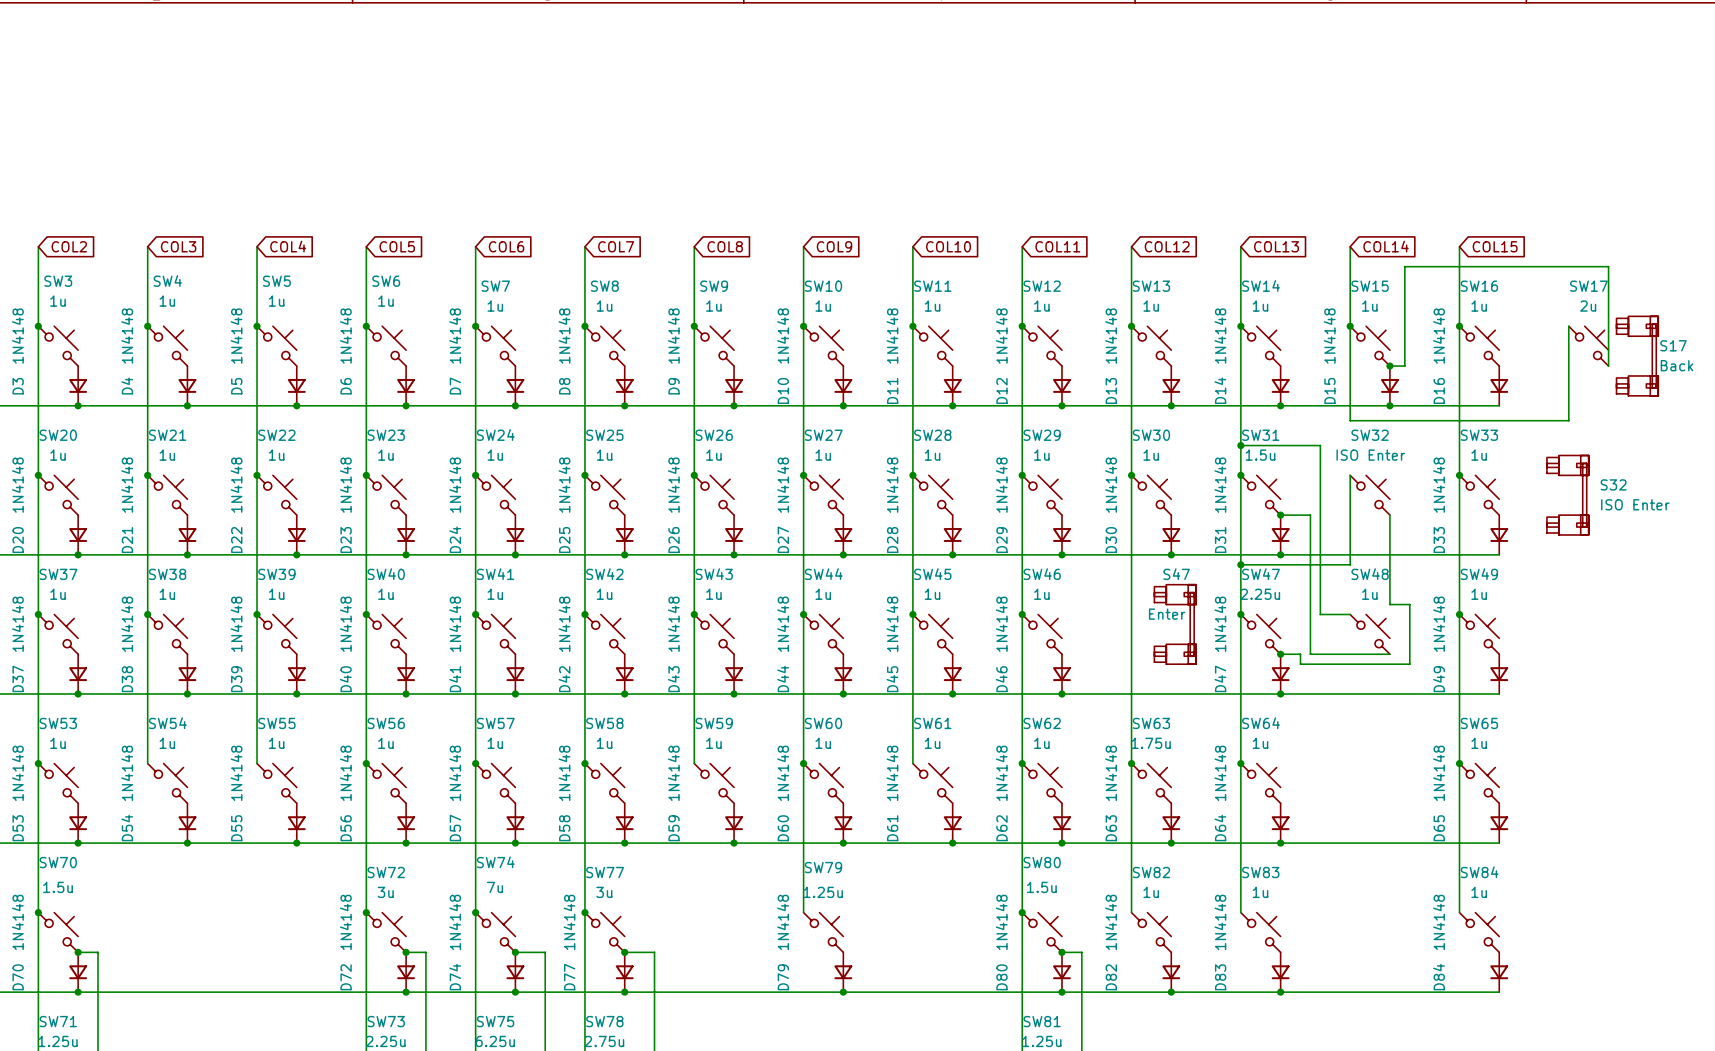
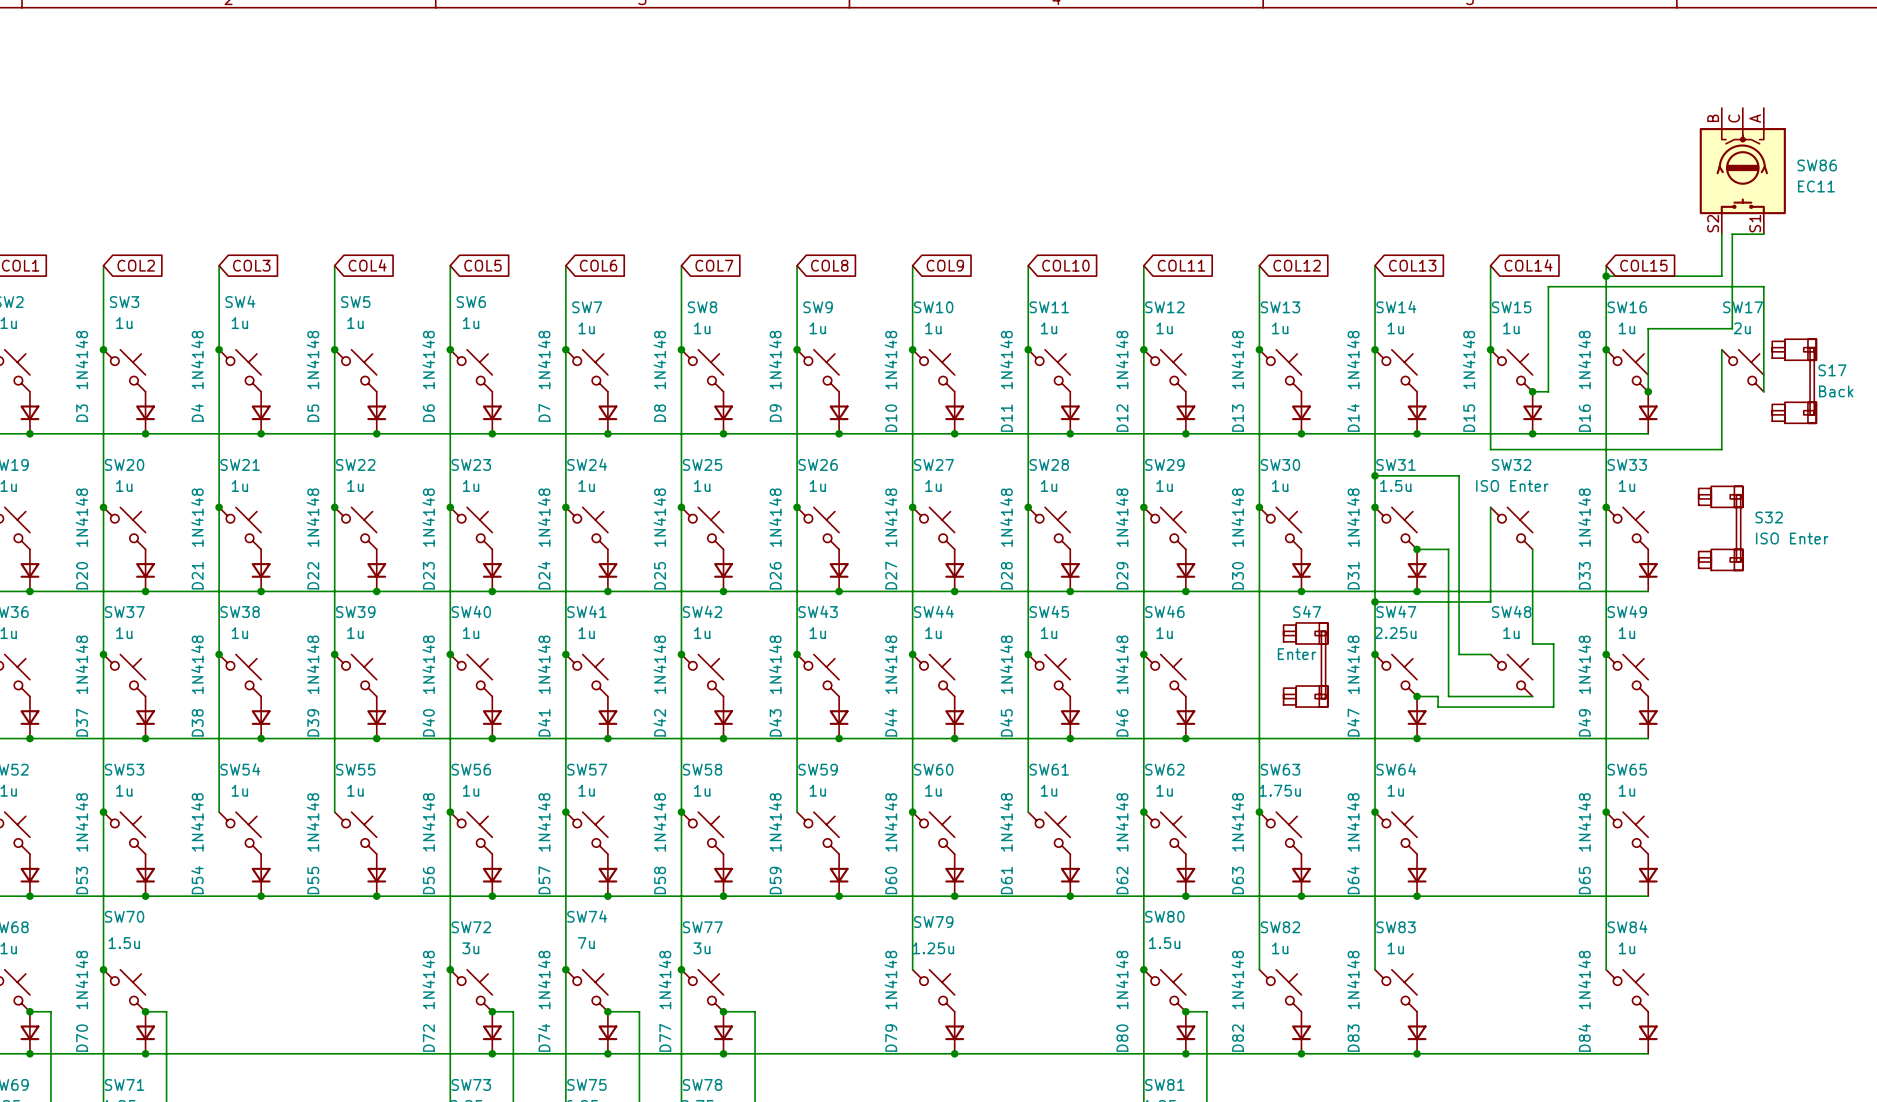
SW86: none -> EC11 (1742, 171)
wire: none -> (1721, 234) (1721, 276) (1606, 276)
wire: none -> (1763, 234) (1732, 234) (1732, 328) (1648, 328) (1648, 391)
junction: none -> (1606, 276)
junction: none -> (1648, 391)

